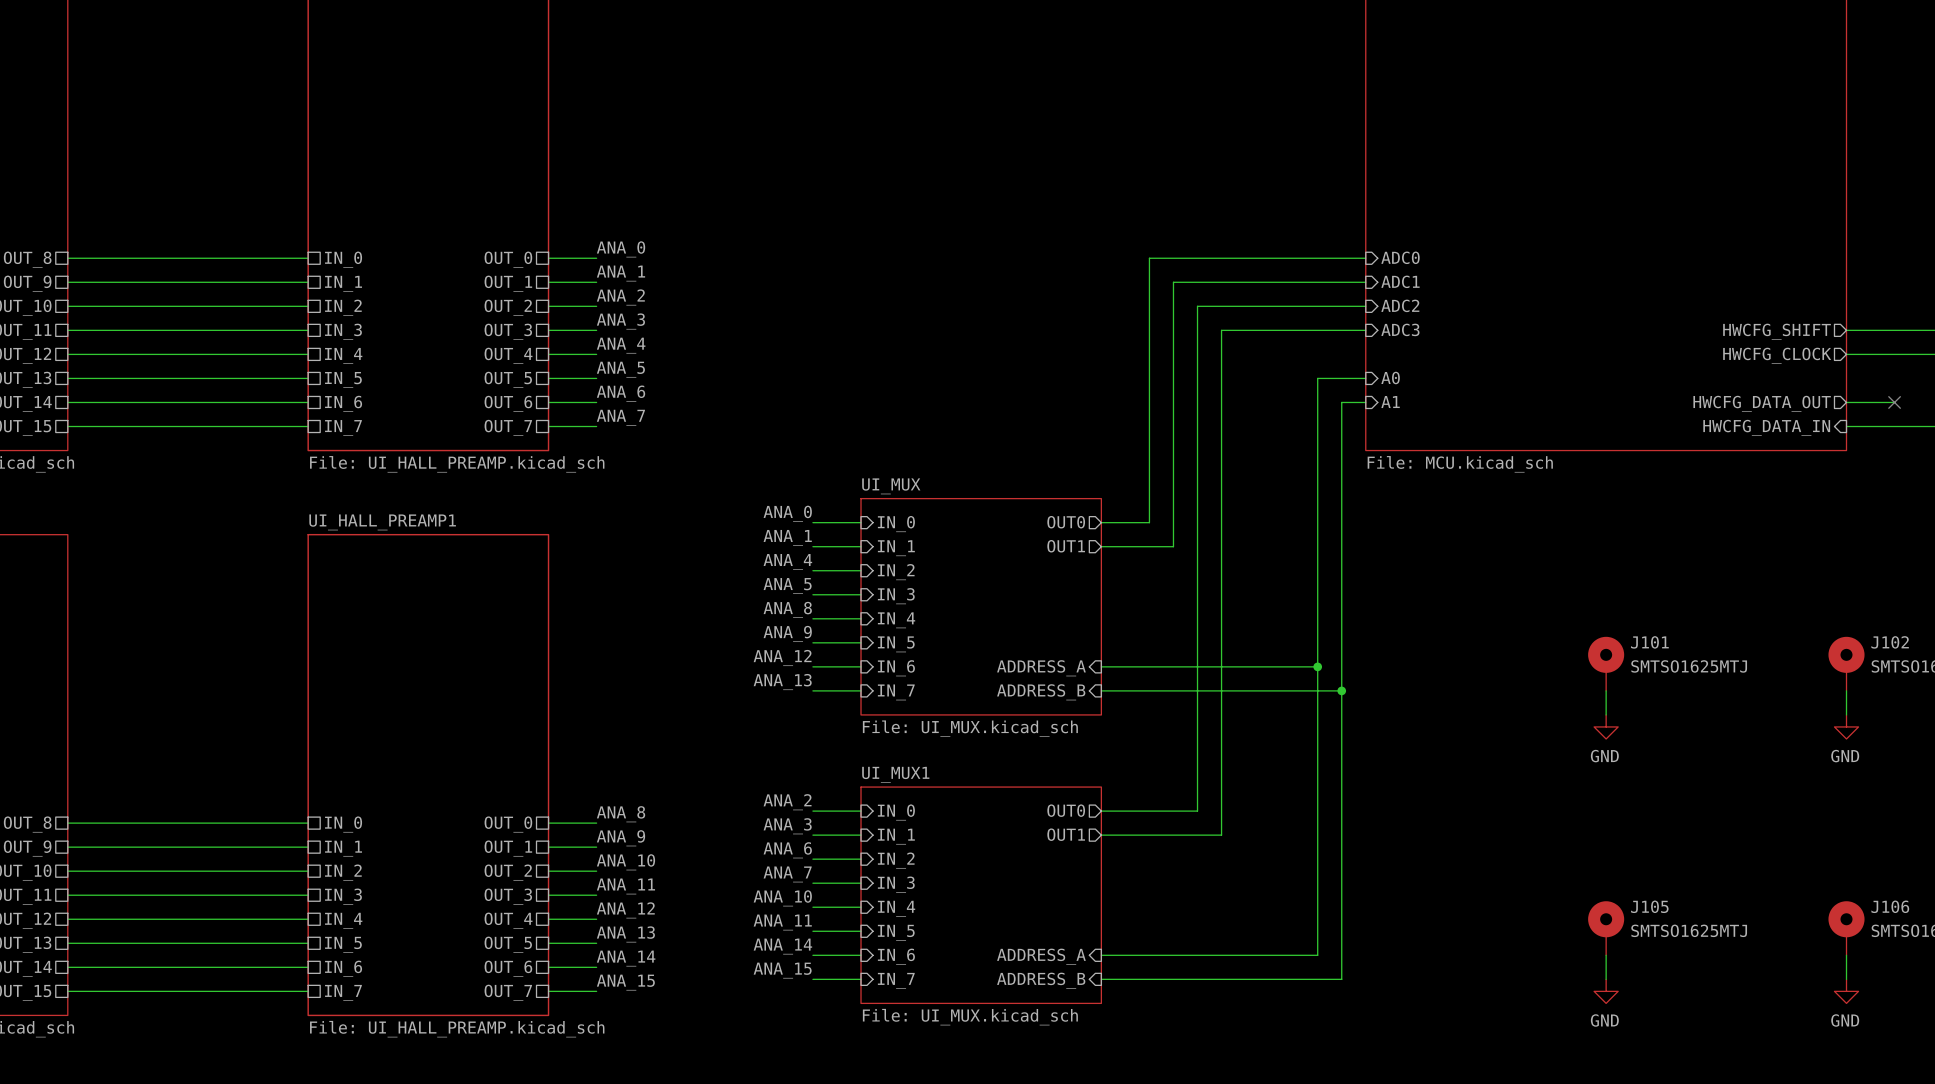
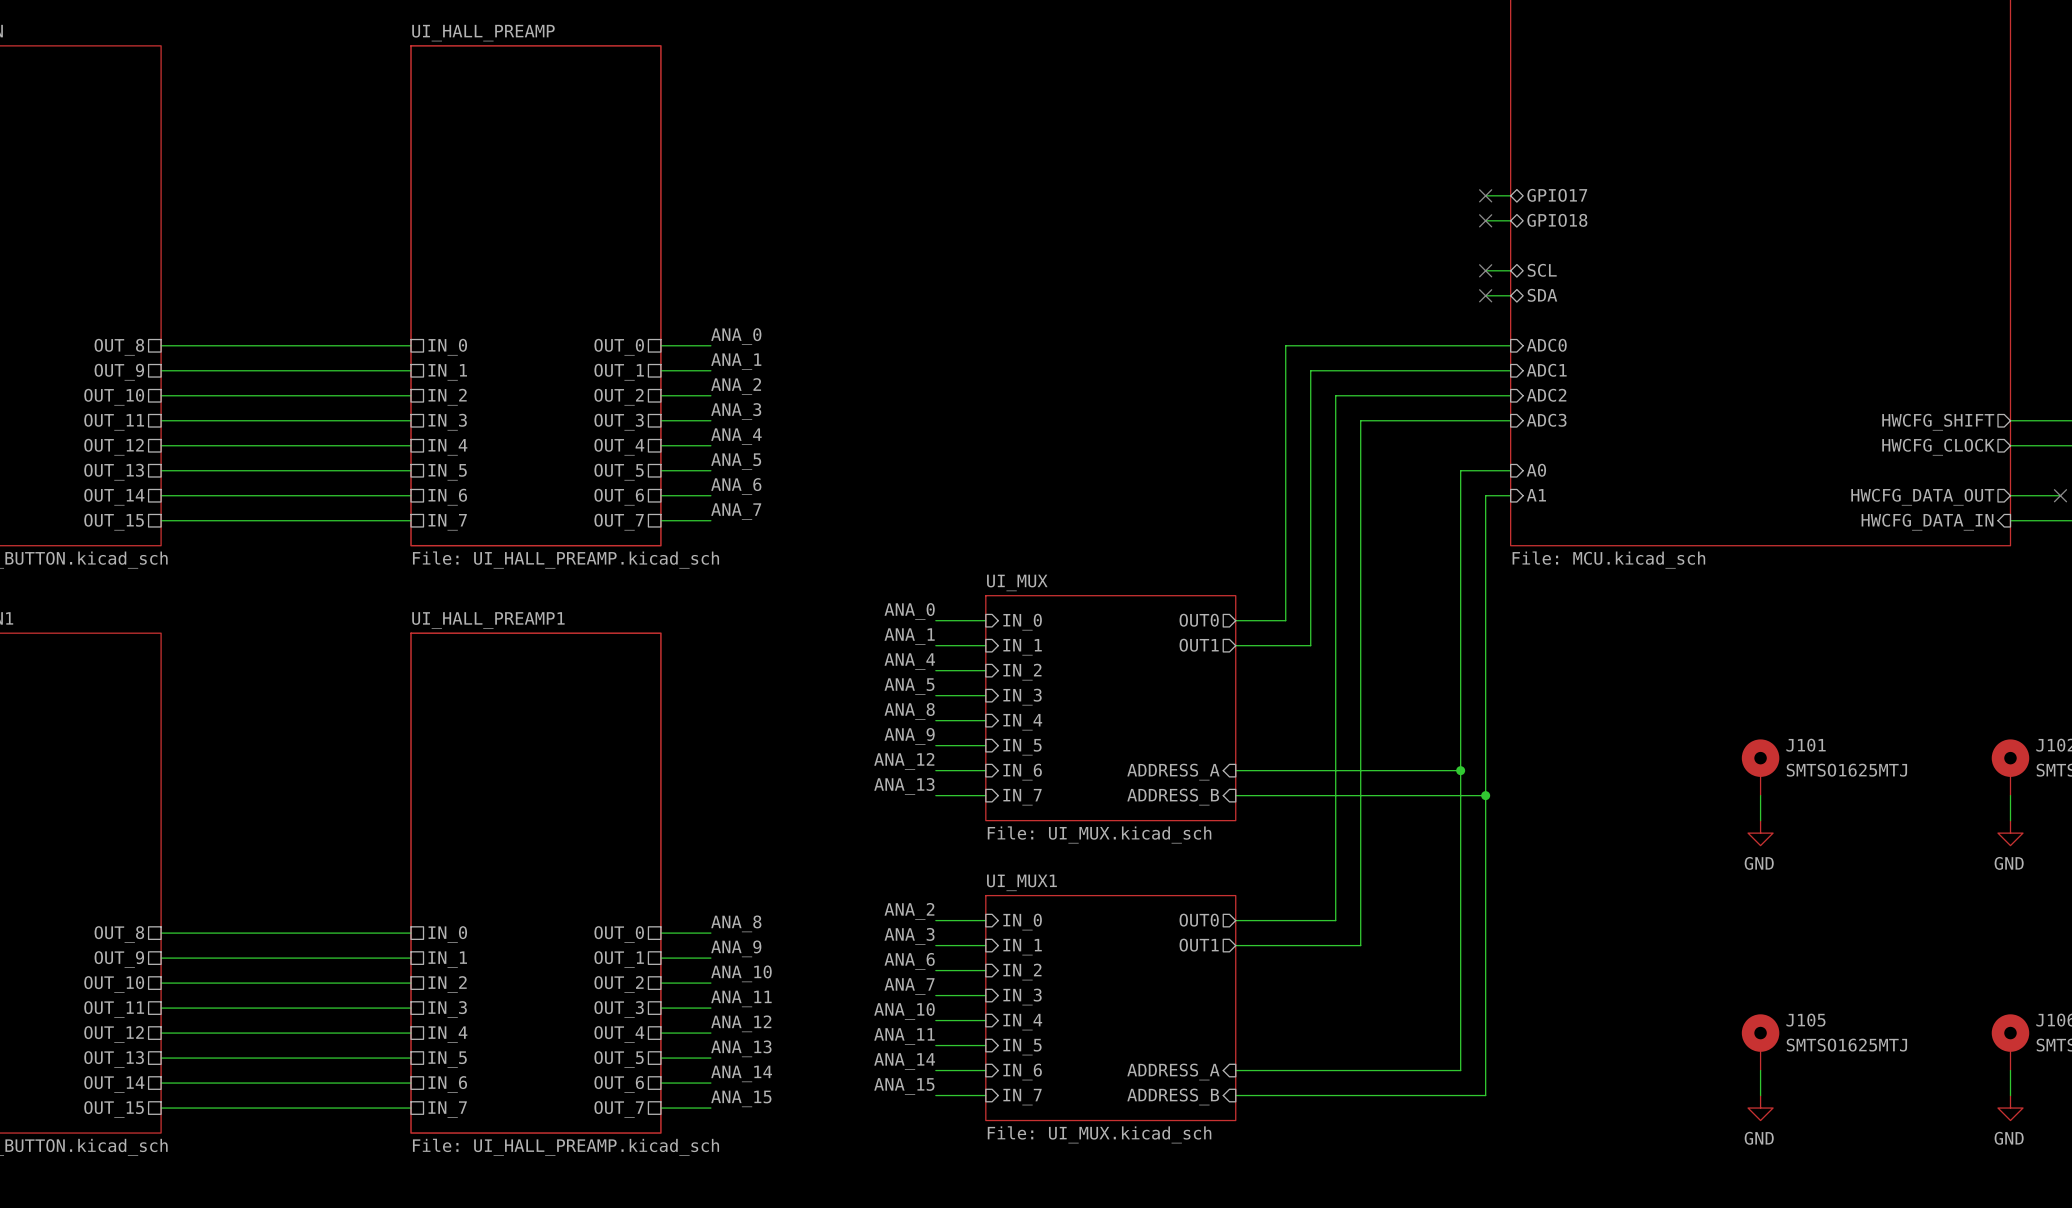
sheet pin: none -> GPIO17 (1557, 195)
wire: none -> (1485, 195) (1510, 195)
no-connect mark: none -> (1485, 195)
sheet pin: none -> GPIO18 (1557, 220)
wire: none -> (1485, 220) (1510, 220)
no-connect mark: none -> (1485, 220)
sheet pin: none -> SCL (1542, 270)
wire: none -> (1485, 270) (1510, 270)
no-connect mark: none -> (1485, 270)
sheet pin: none -> SDA (1542, 295)
wire: none -> (1485, 295) (1510, 295)
no-connect mark: none -> (1485, 295)

